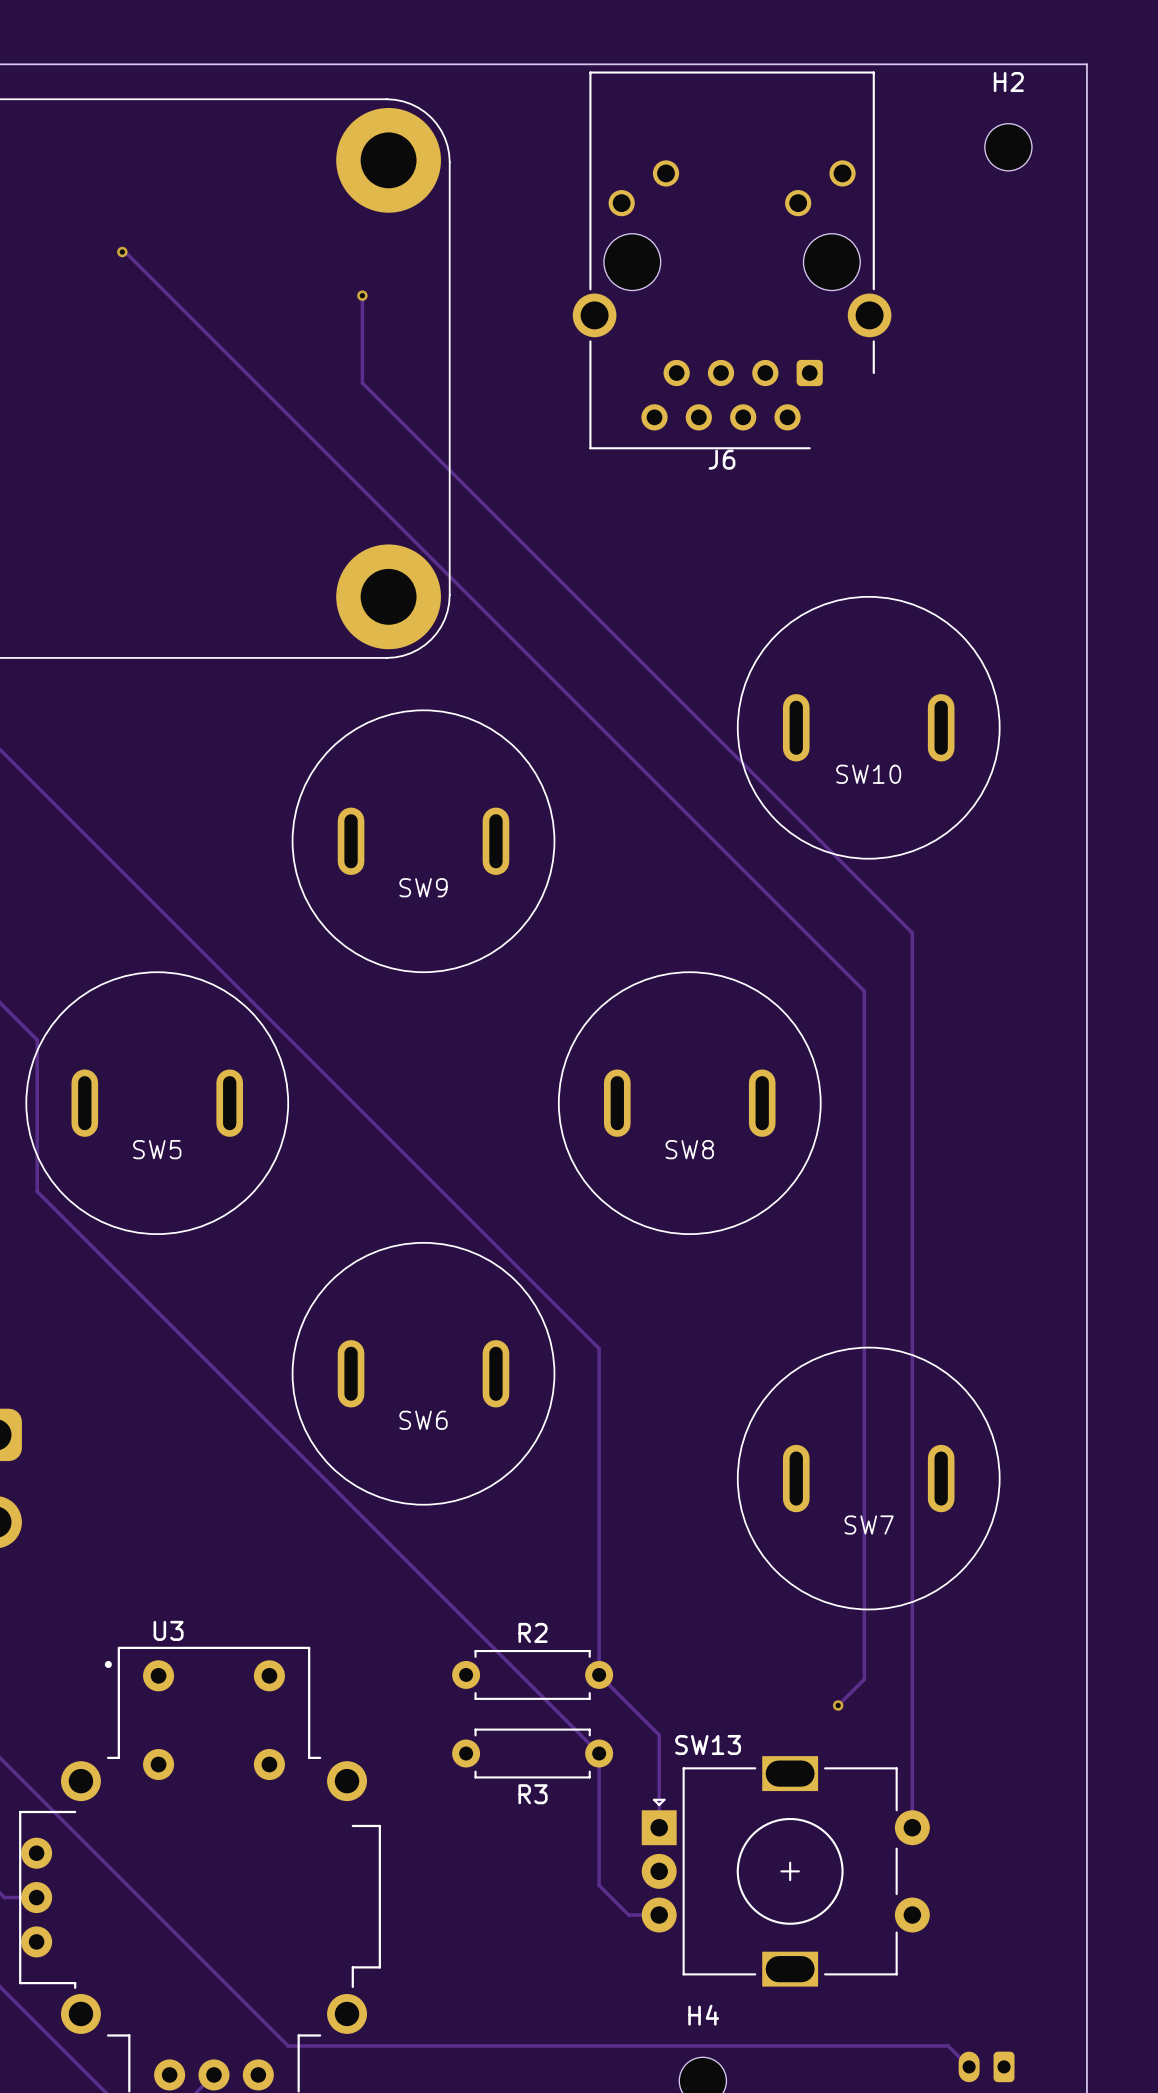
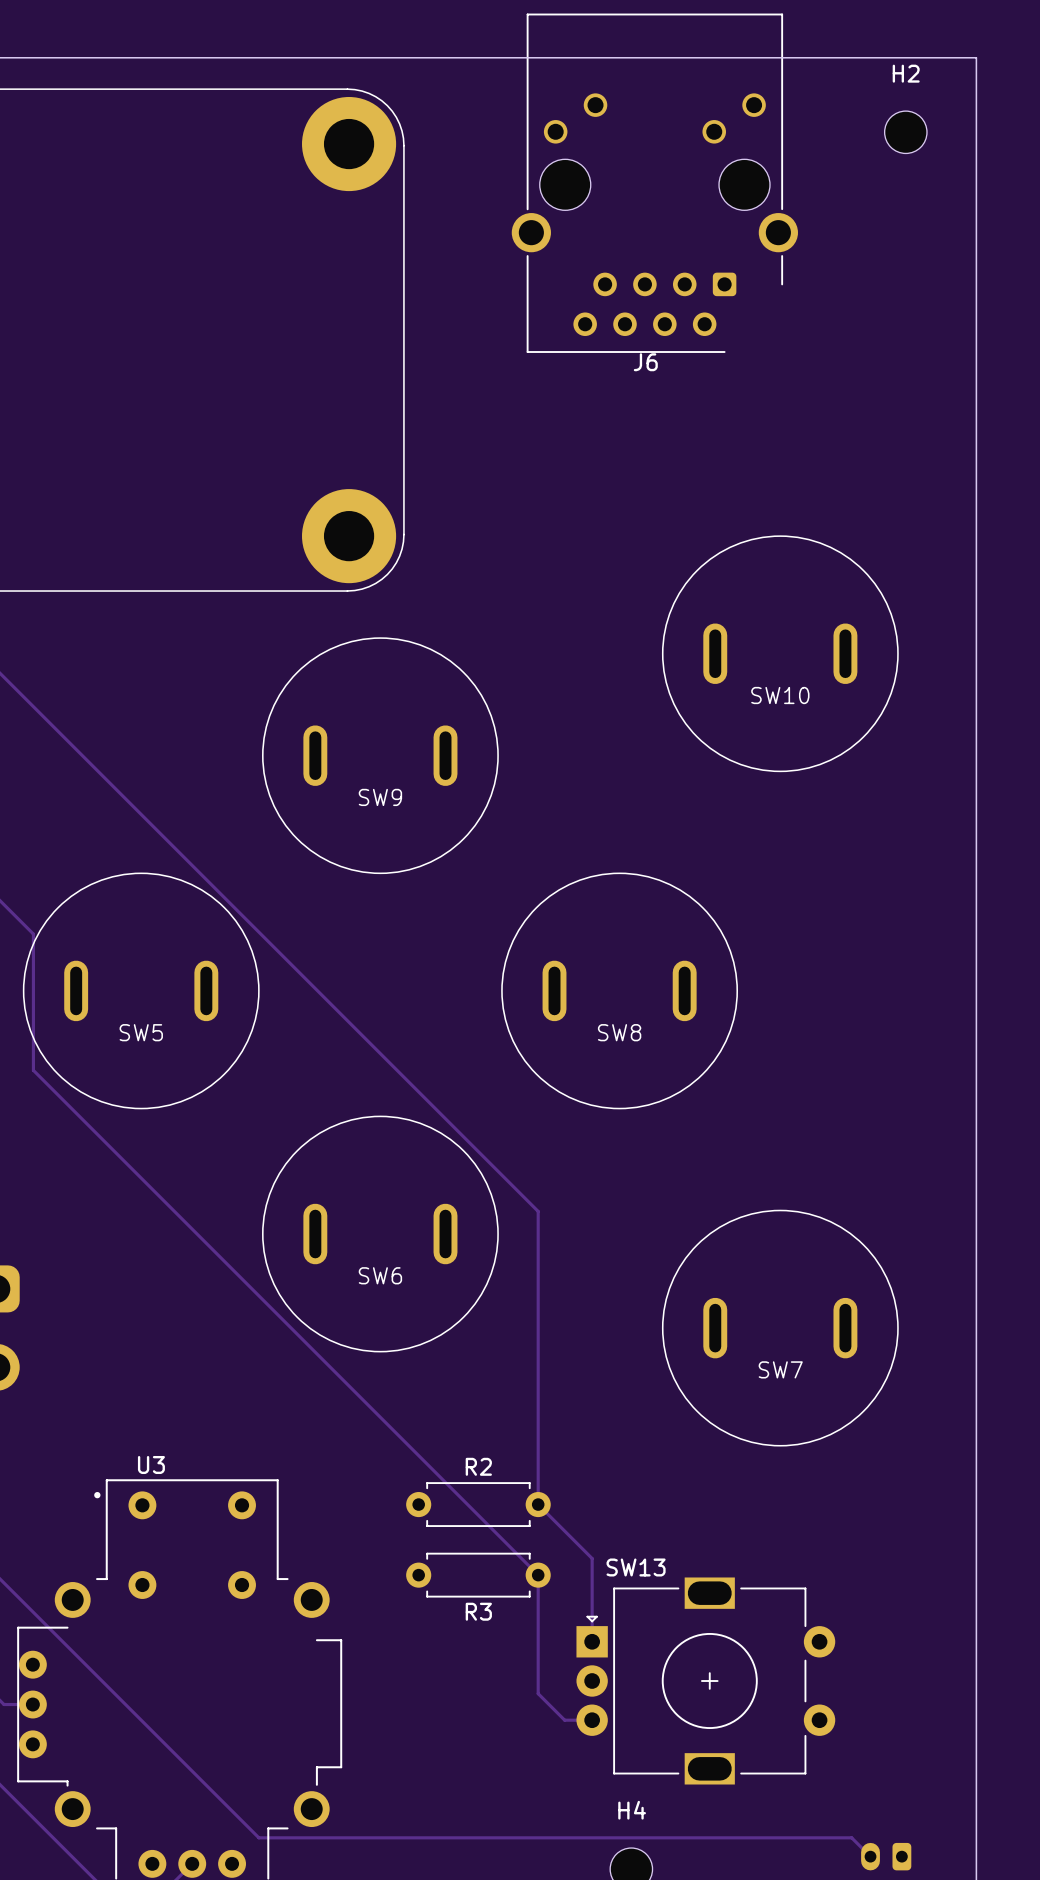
track: (122, 252) (125, 252) (864, 991) (864, 1679) (838, 1705) -> none
via: (122, 252) -> none
J6 position: (732, 260) -> (654, 183)
track: (362, 295) (362, 382) (912, 932) (912, 1827) -> none
via: (362, 295) -> none
via: (838, 1705) -> none

